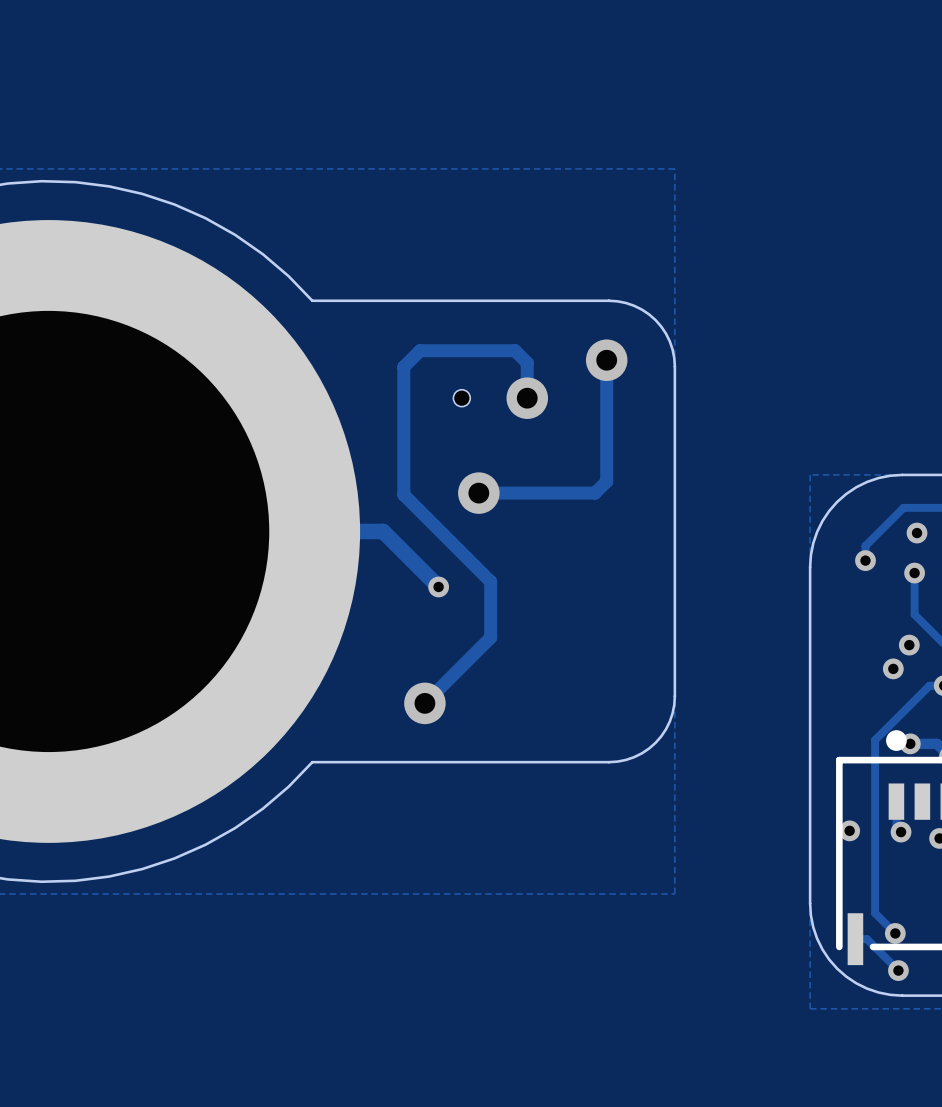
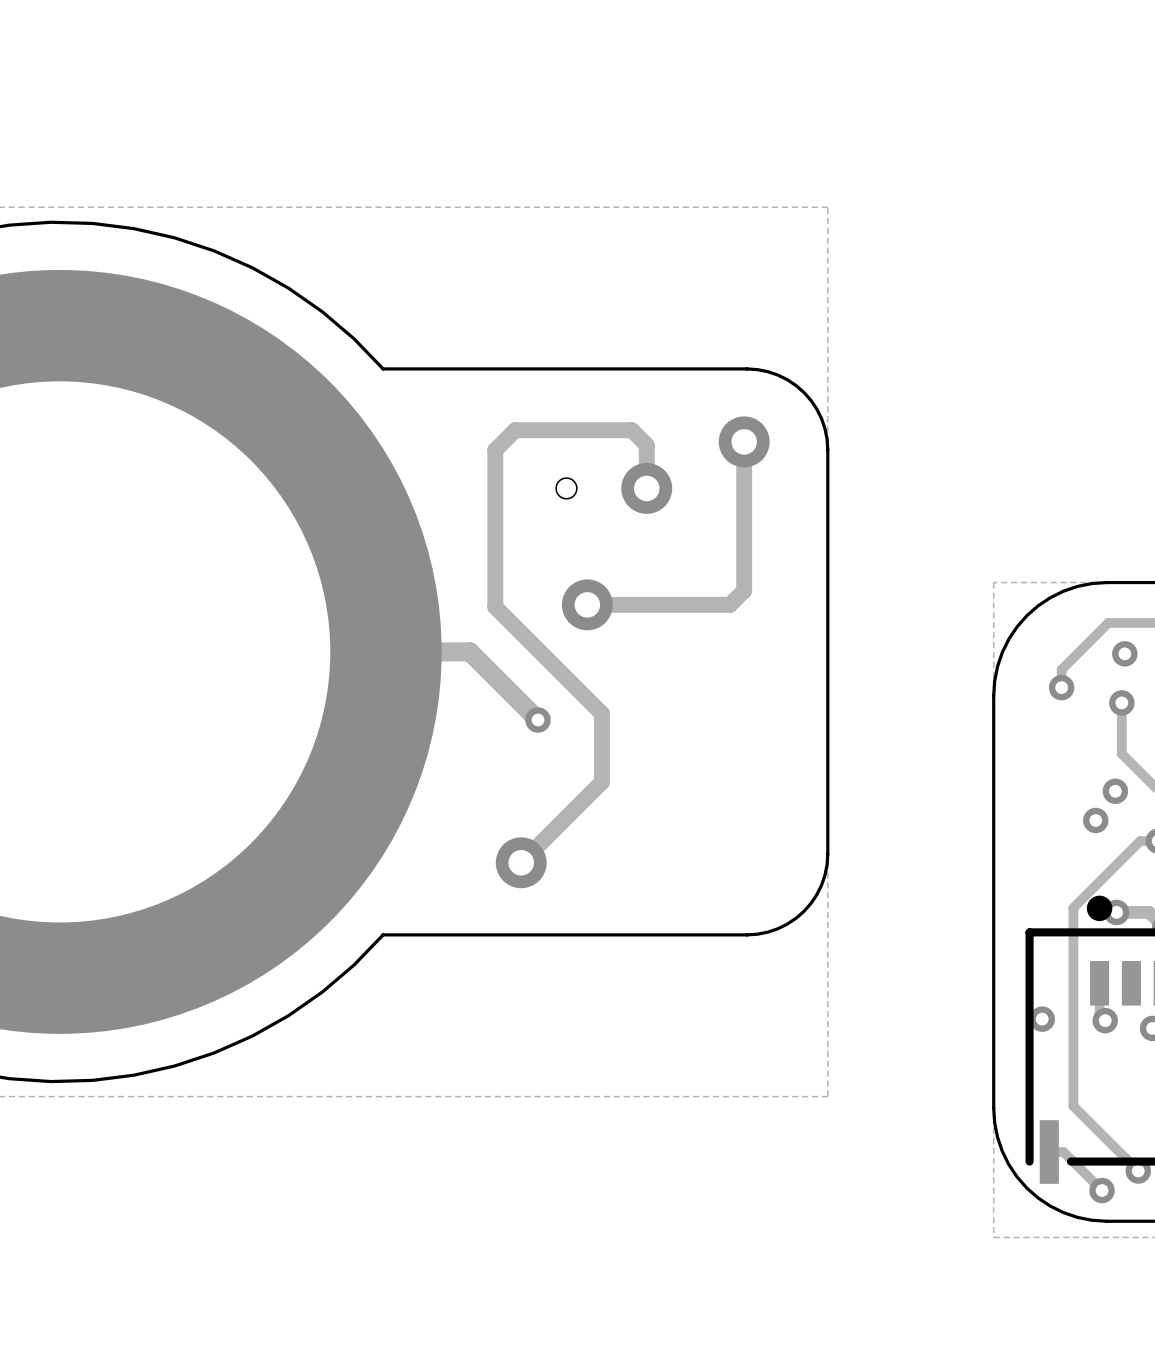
track: (875, 901) (875, 913) (895, 933) -> (1073, 1106) (1138, 1170)
via position: (895, 933) -> (1138, 1170)

